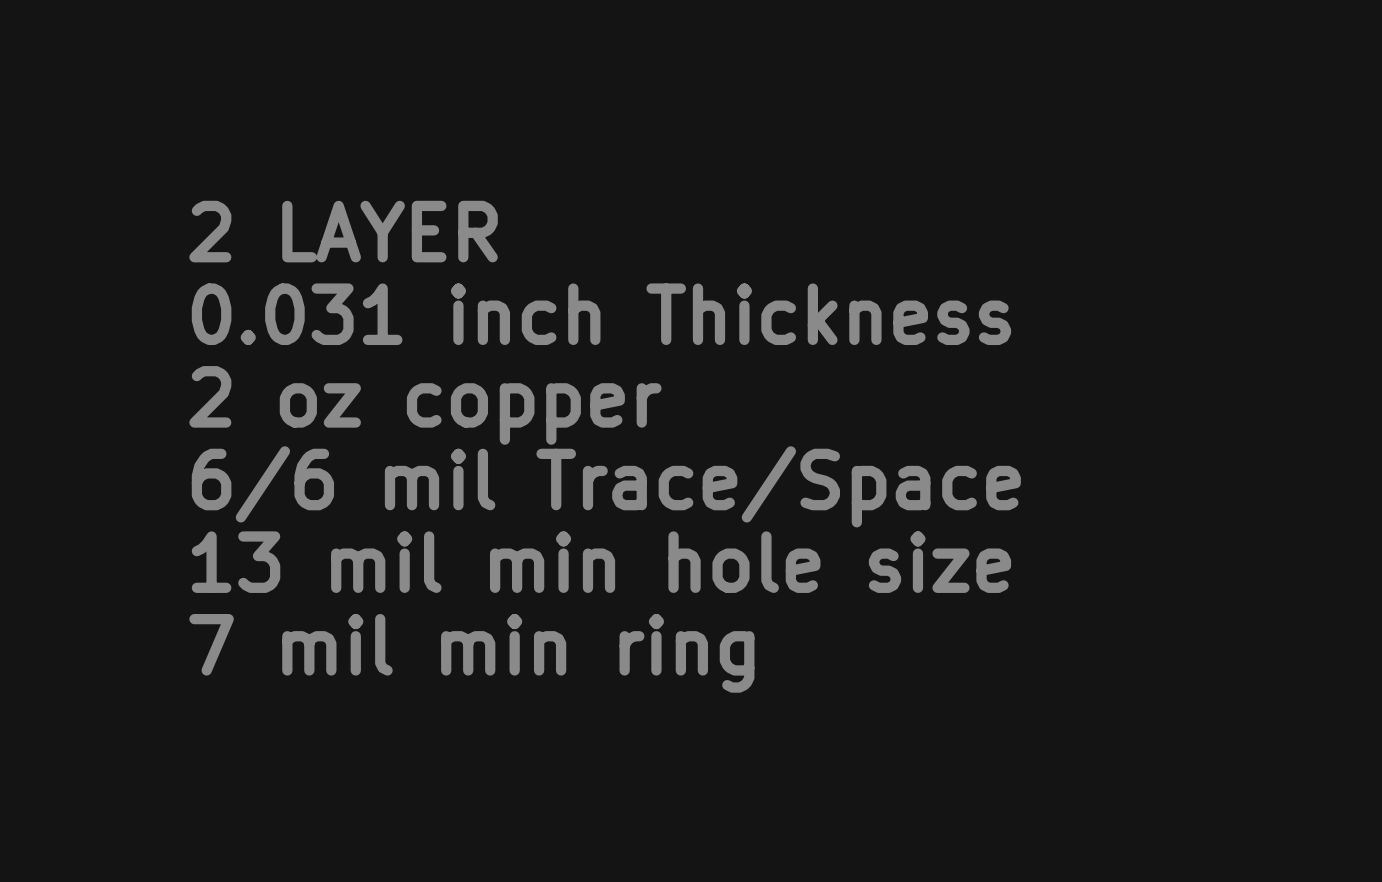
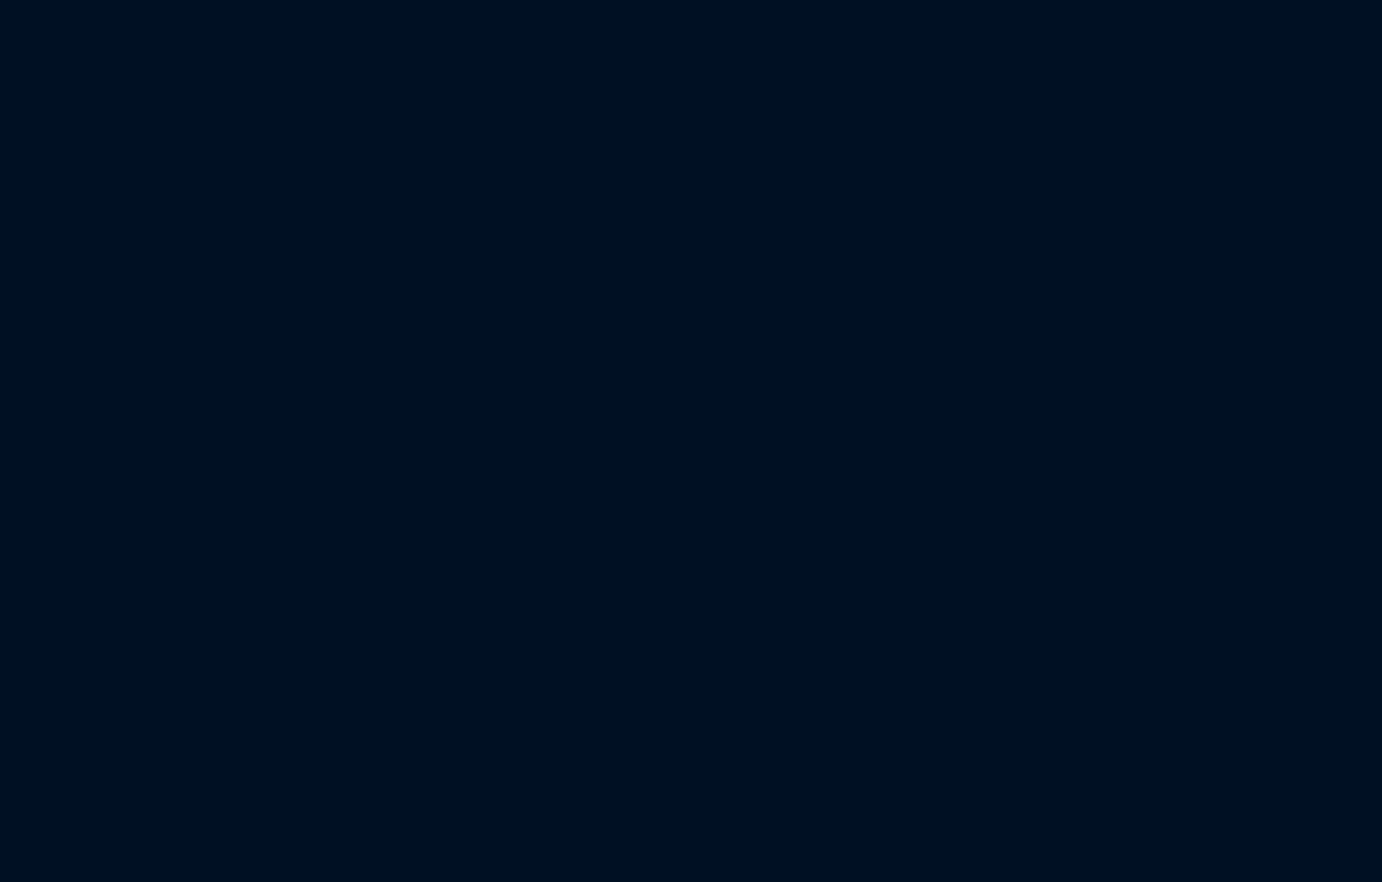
text: 2 LAYER (343, 231) -> none
text: 0.031 inch Thickness (601, 314) -> none
text: 2 oz copper (425, 405) -> none
text: 6/6 mil Trace/Space (606, 486) -> none
text: 13 mil min hole size (601, 562) -> none
text: 7 mil min ring (471, 653) -> none

